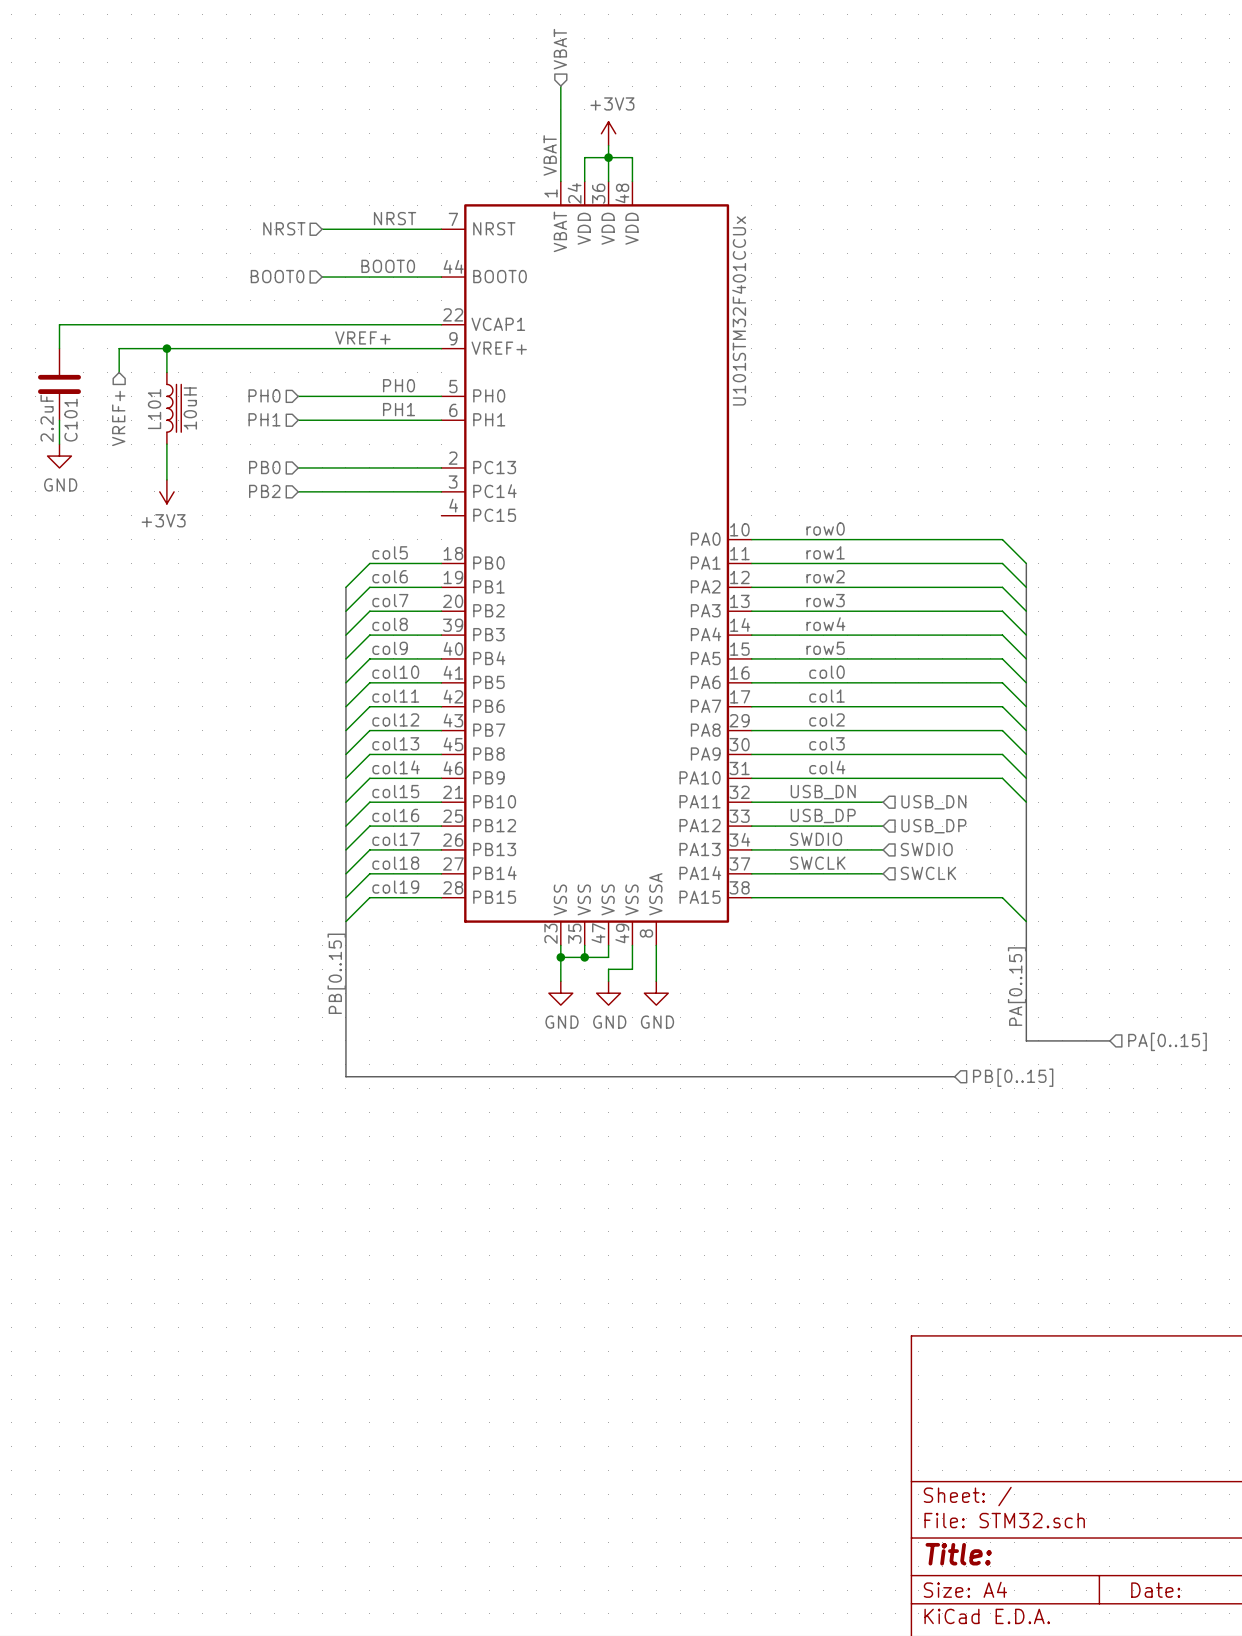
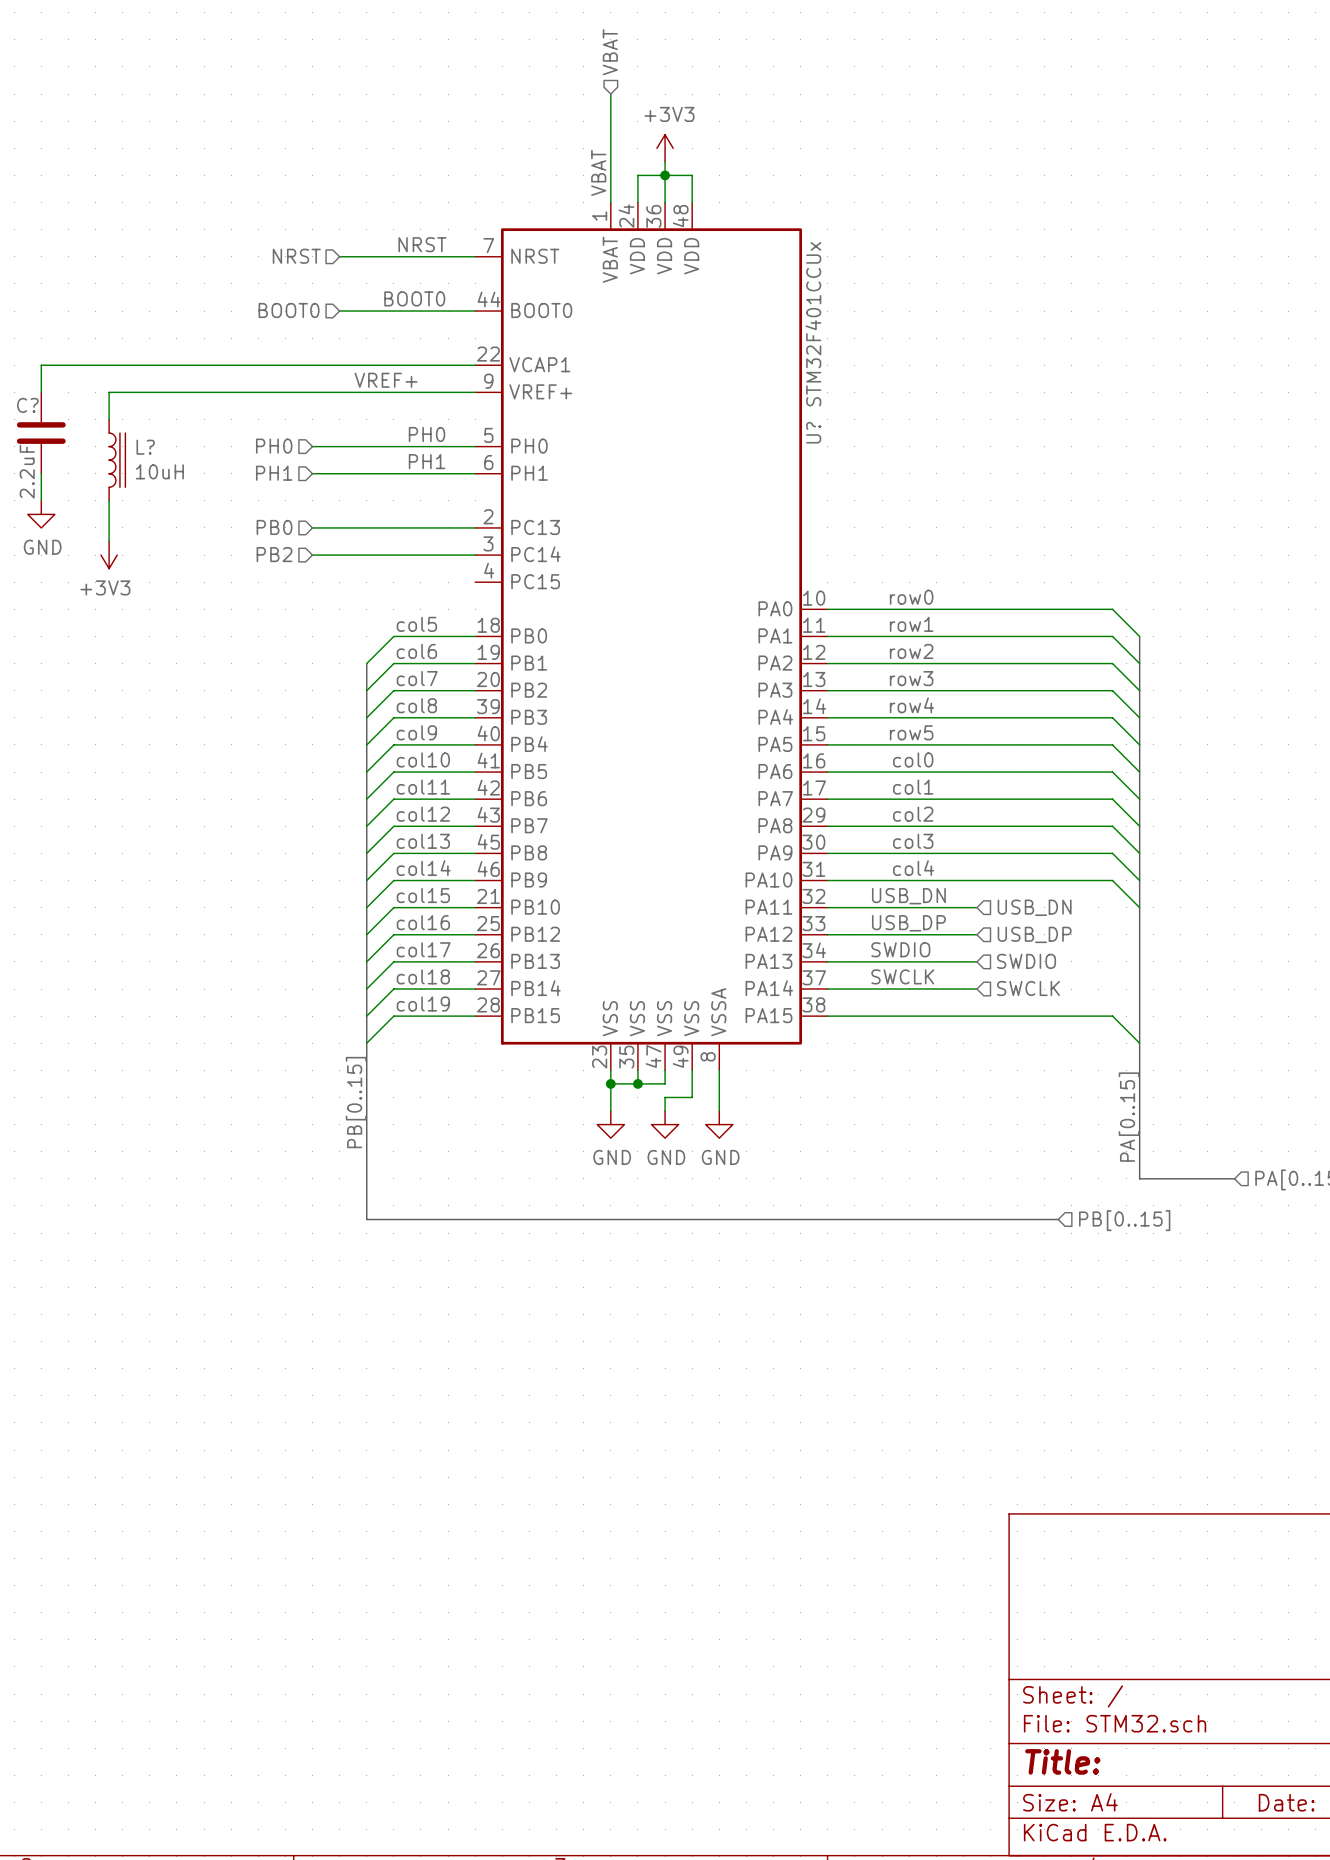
wire: (166, 348) (166, 372) -> none
junction: (166, 348) -> none
U101 name: U101 (739, 384) -> U? (813, 432)
L?: none -> 10uH (117, 460)
L101: 10uH (174, 408) -> none
hierarchical label: VREF+ (118, 418) -> none
C101 name: C101 (70, 420) -> C? (27, 405)
wire: (166, 444) (166, 479) -> (109, 500) (109, 541)
power symbol position: +3V3 (166, 491) -> +3V3 (109, 555)

